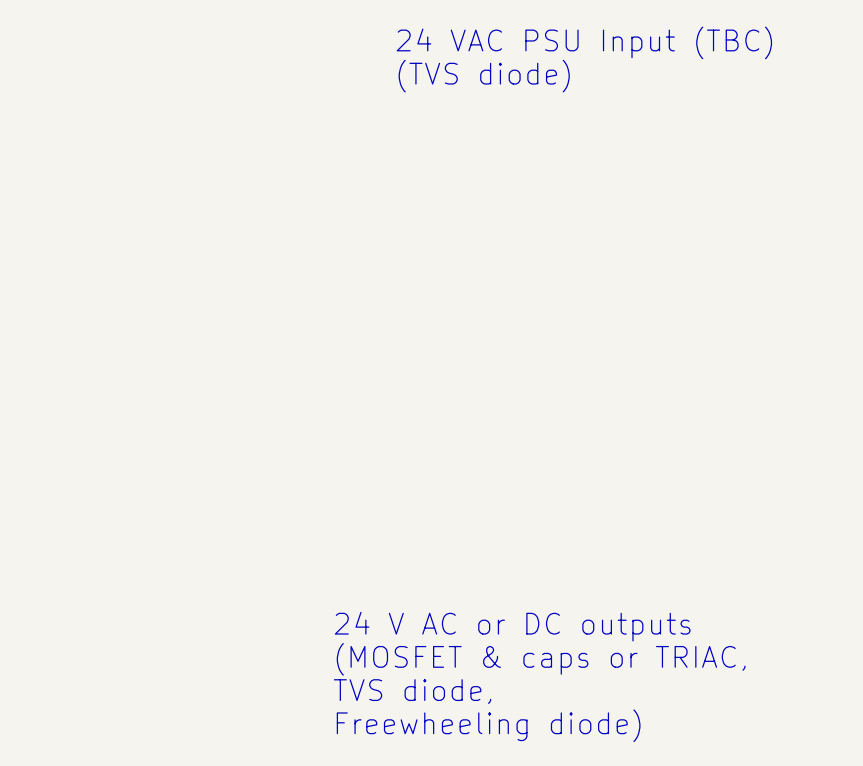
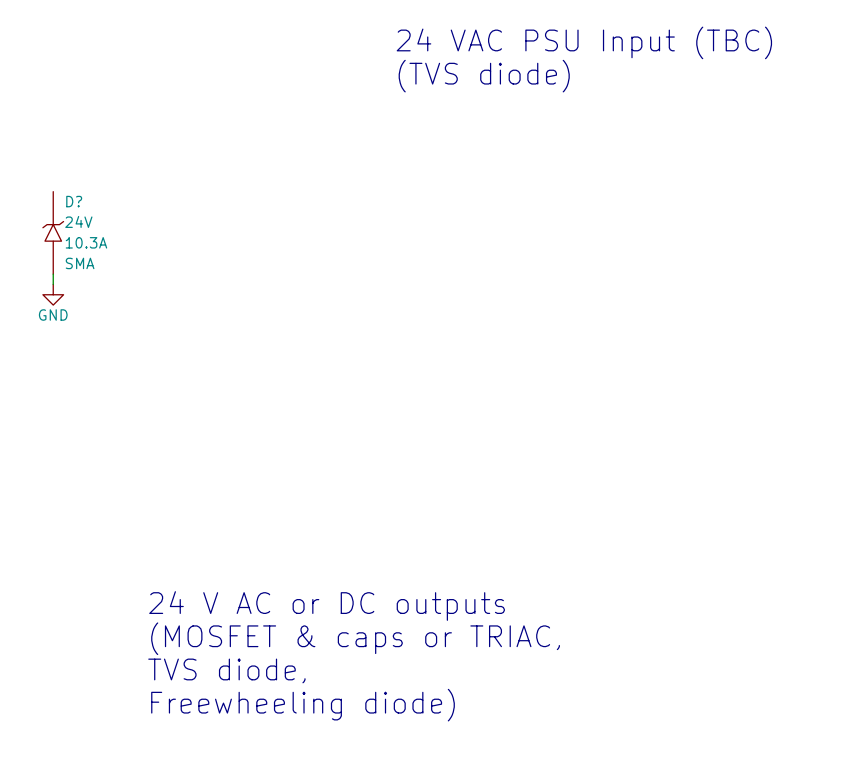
D?: none -> (53, 232)
wire: none -> (53, 274) (53, 284)
power symbol: none -> GND (53, 294)
text position: 24 V AC or DC outputs (512, 626) -> 24 V AC or DC outputs (327, 606)
text position: (MOSFET & caps or TRIAC, (541, 659) -> (MOSFET & caps or TRIAC, (355, 638)
text position: TVS diode, (412, 691) -> TVS diode, (226, 670)
text position: Freewheeling diode) (488, 725) -> Freewheeling diode) (303, 705)

